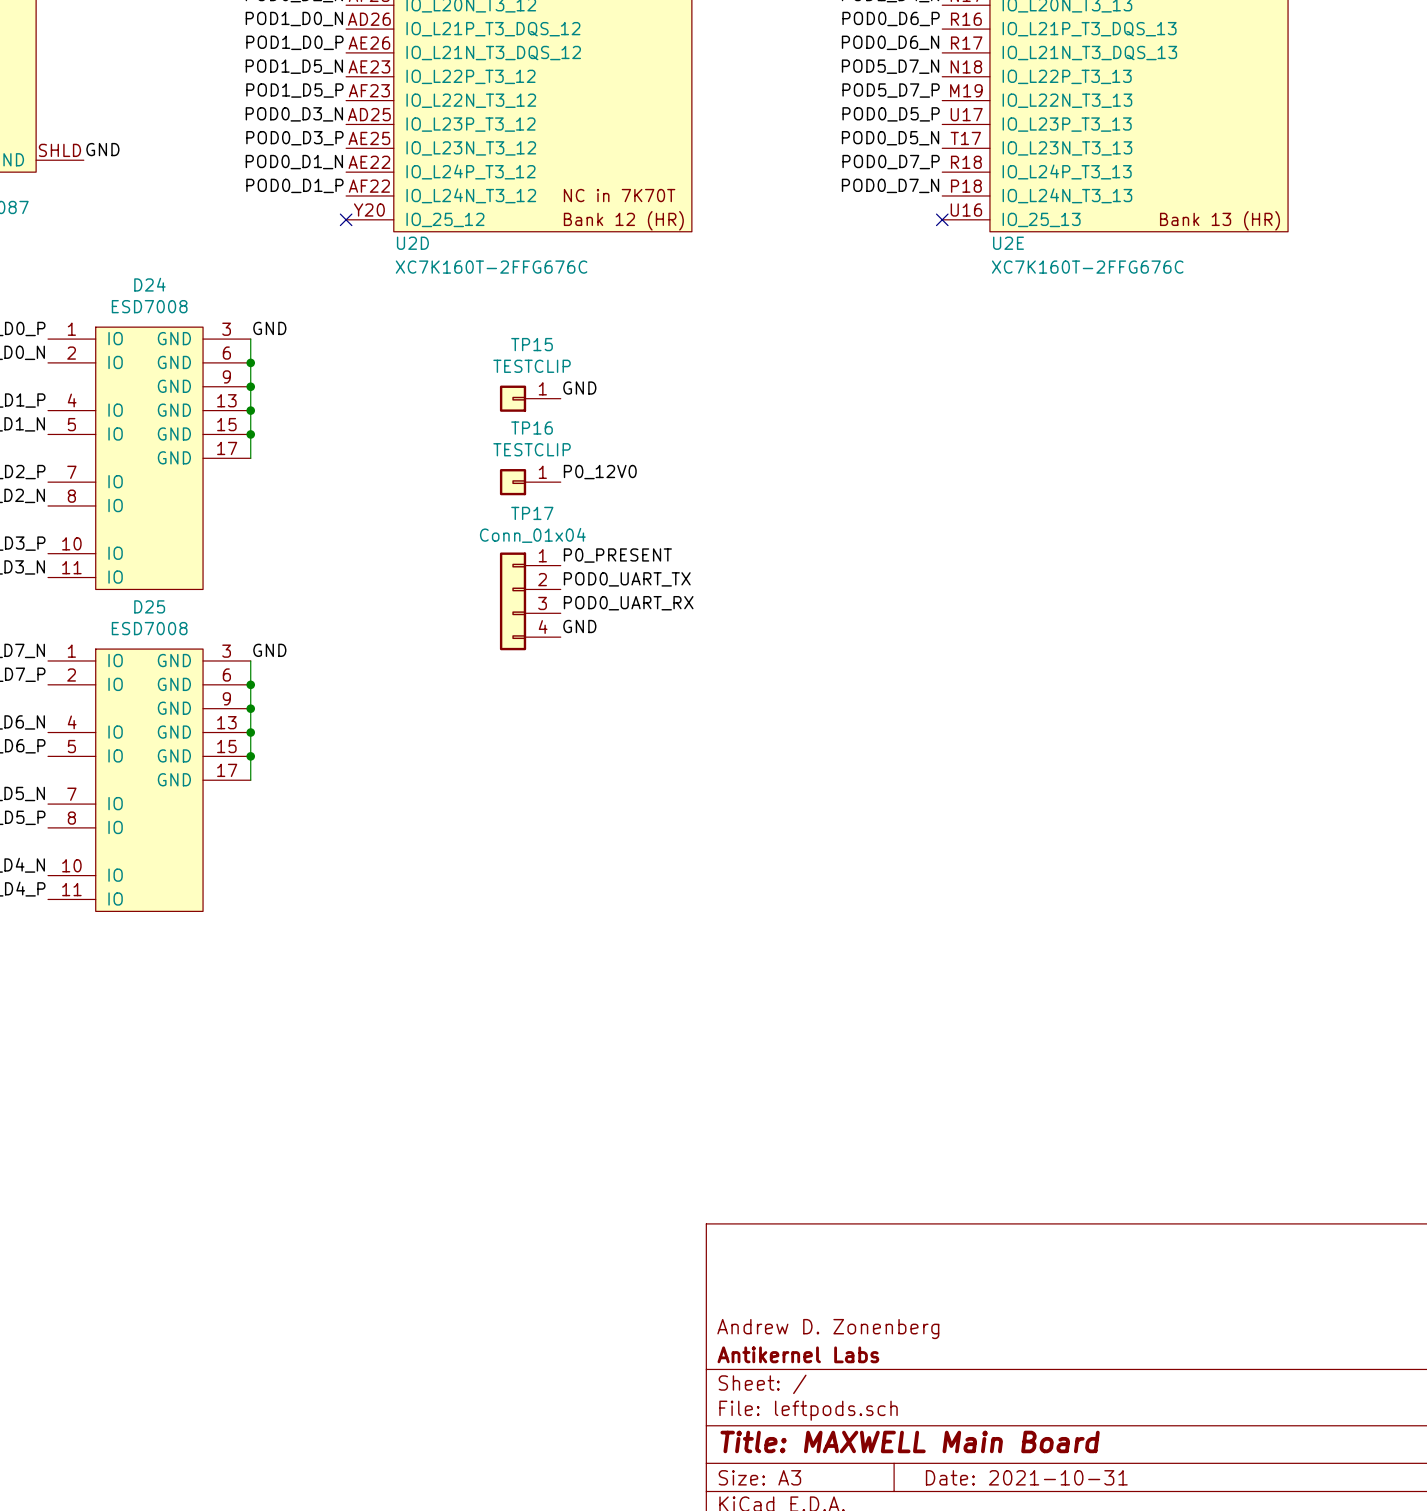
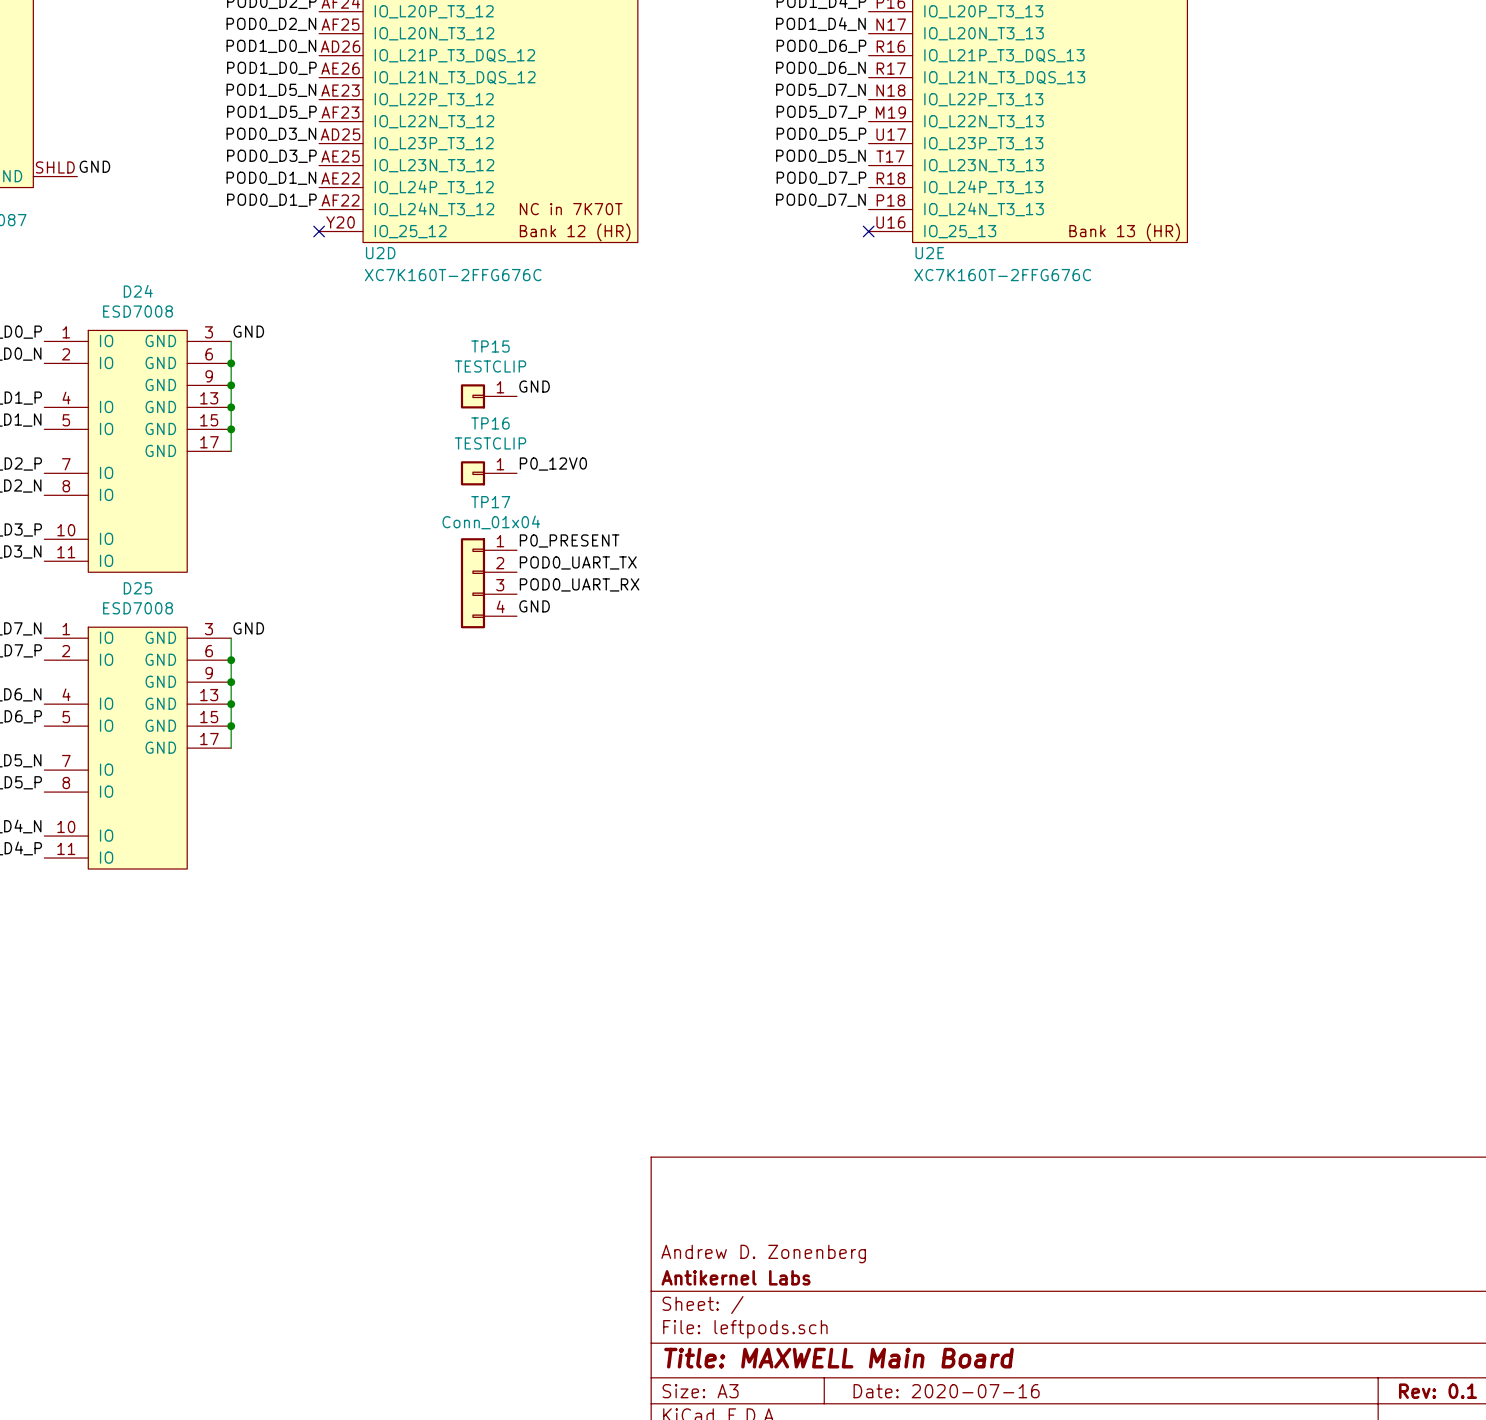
title block: Date: 2021-10-31 (1026, 1477) -> Date: 2020-07-16 (946, 1391)

